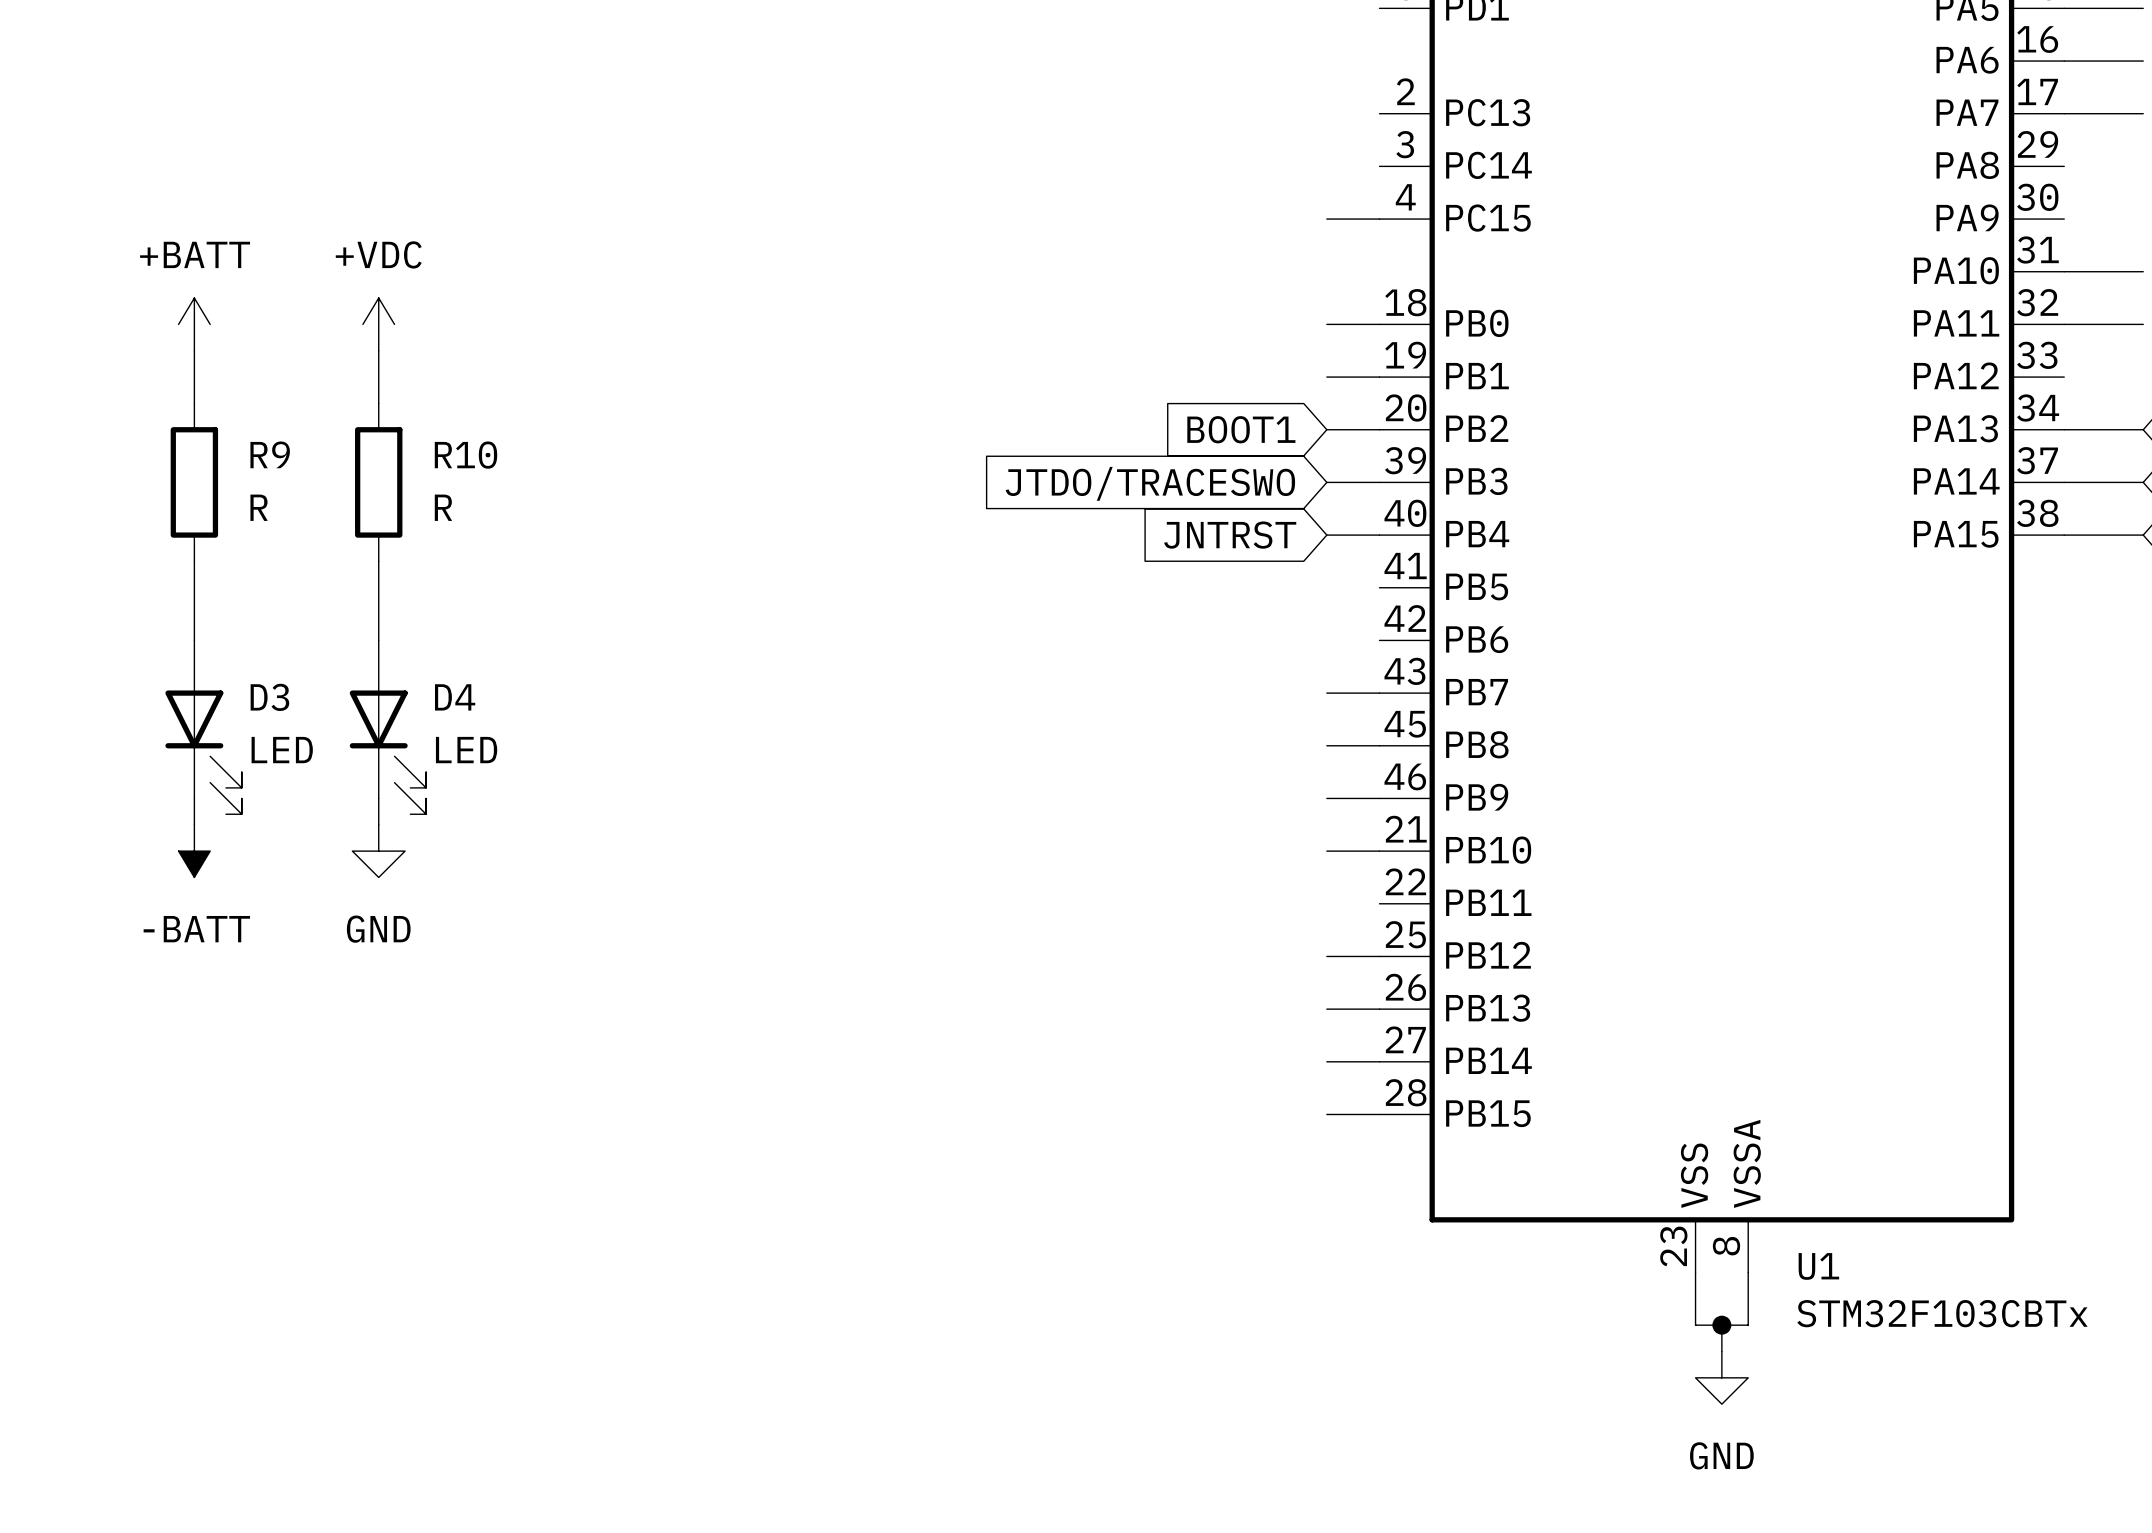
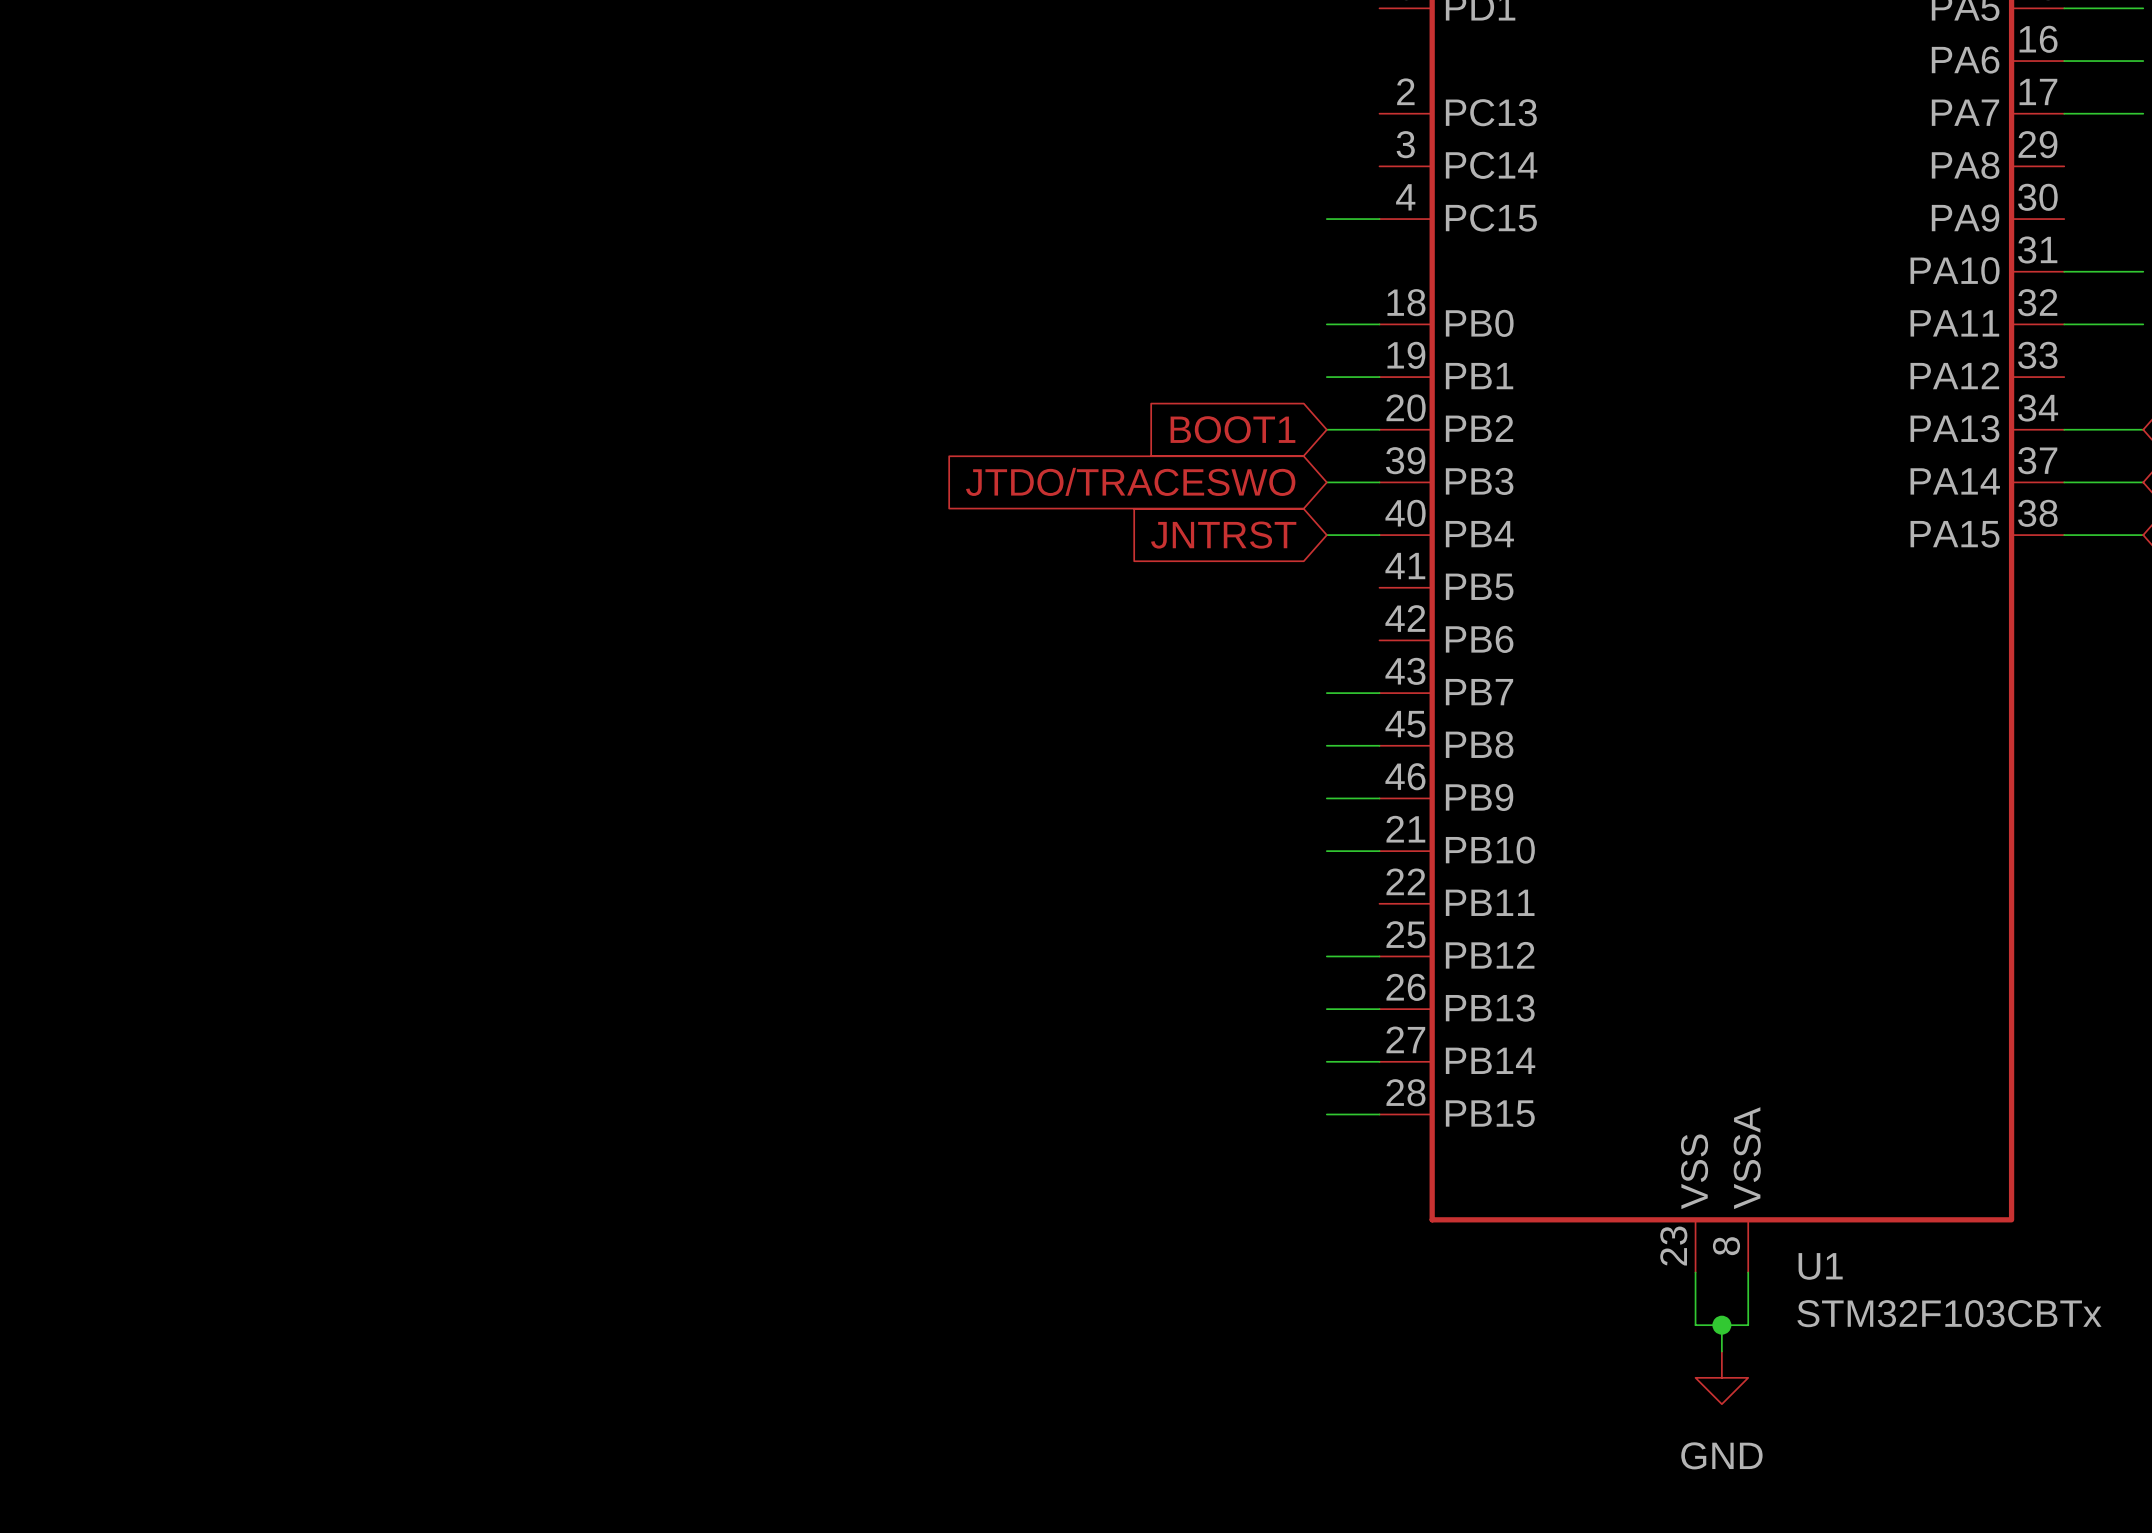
power symbol: +BATT (194, 324) -> none
power symbol: +VDC (378, 324) -> none
wire: (194, 350) (194, 403) -> none
wire: (378, 350) (378, 403) -> none
R9: R (194, 482) -> none
R10: R (378, 482) -> none
wire: (194, 561) (194, 640) -> none
wire: (378, 561) (378, 640) -> none
D3: LED (203, 727) -> none
D4: LED (387, 727) -> none
wire: (194, 798) (194, 824) -> none
wire: (378, 798) (378, 824) -> none
power symbol: -BATT (194, 851) -> none
power symbol: GND (378, 851) -> none

